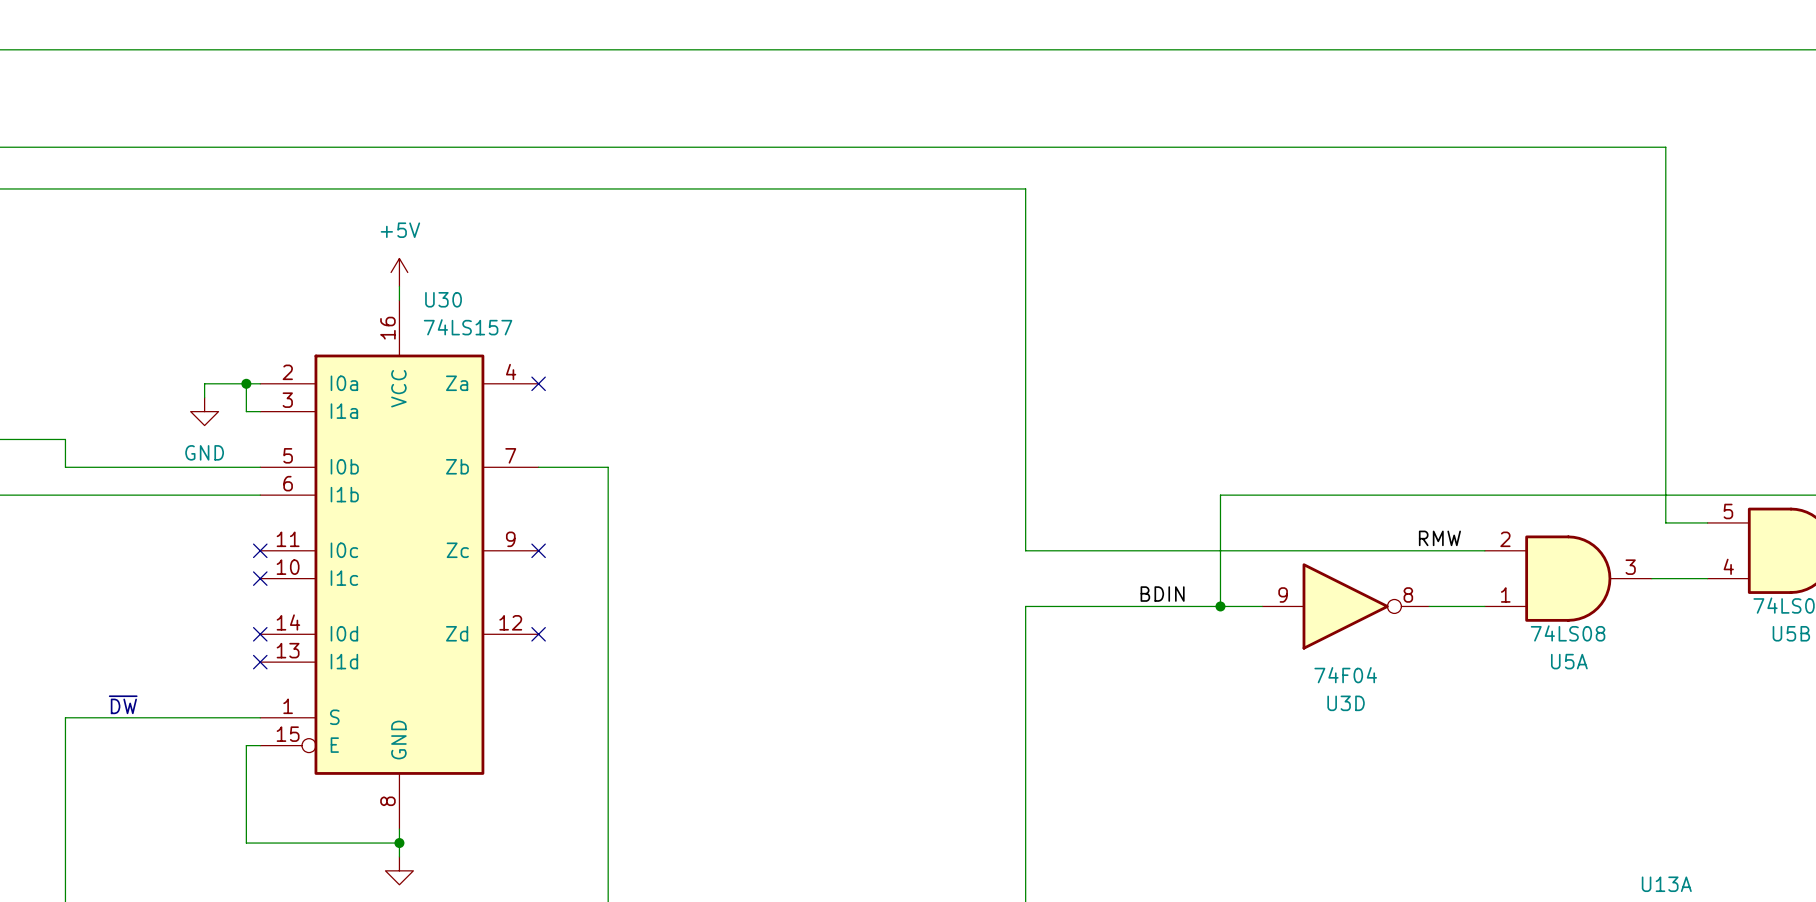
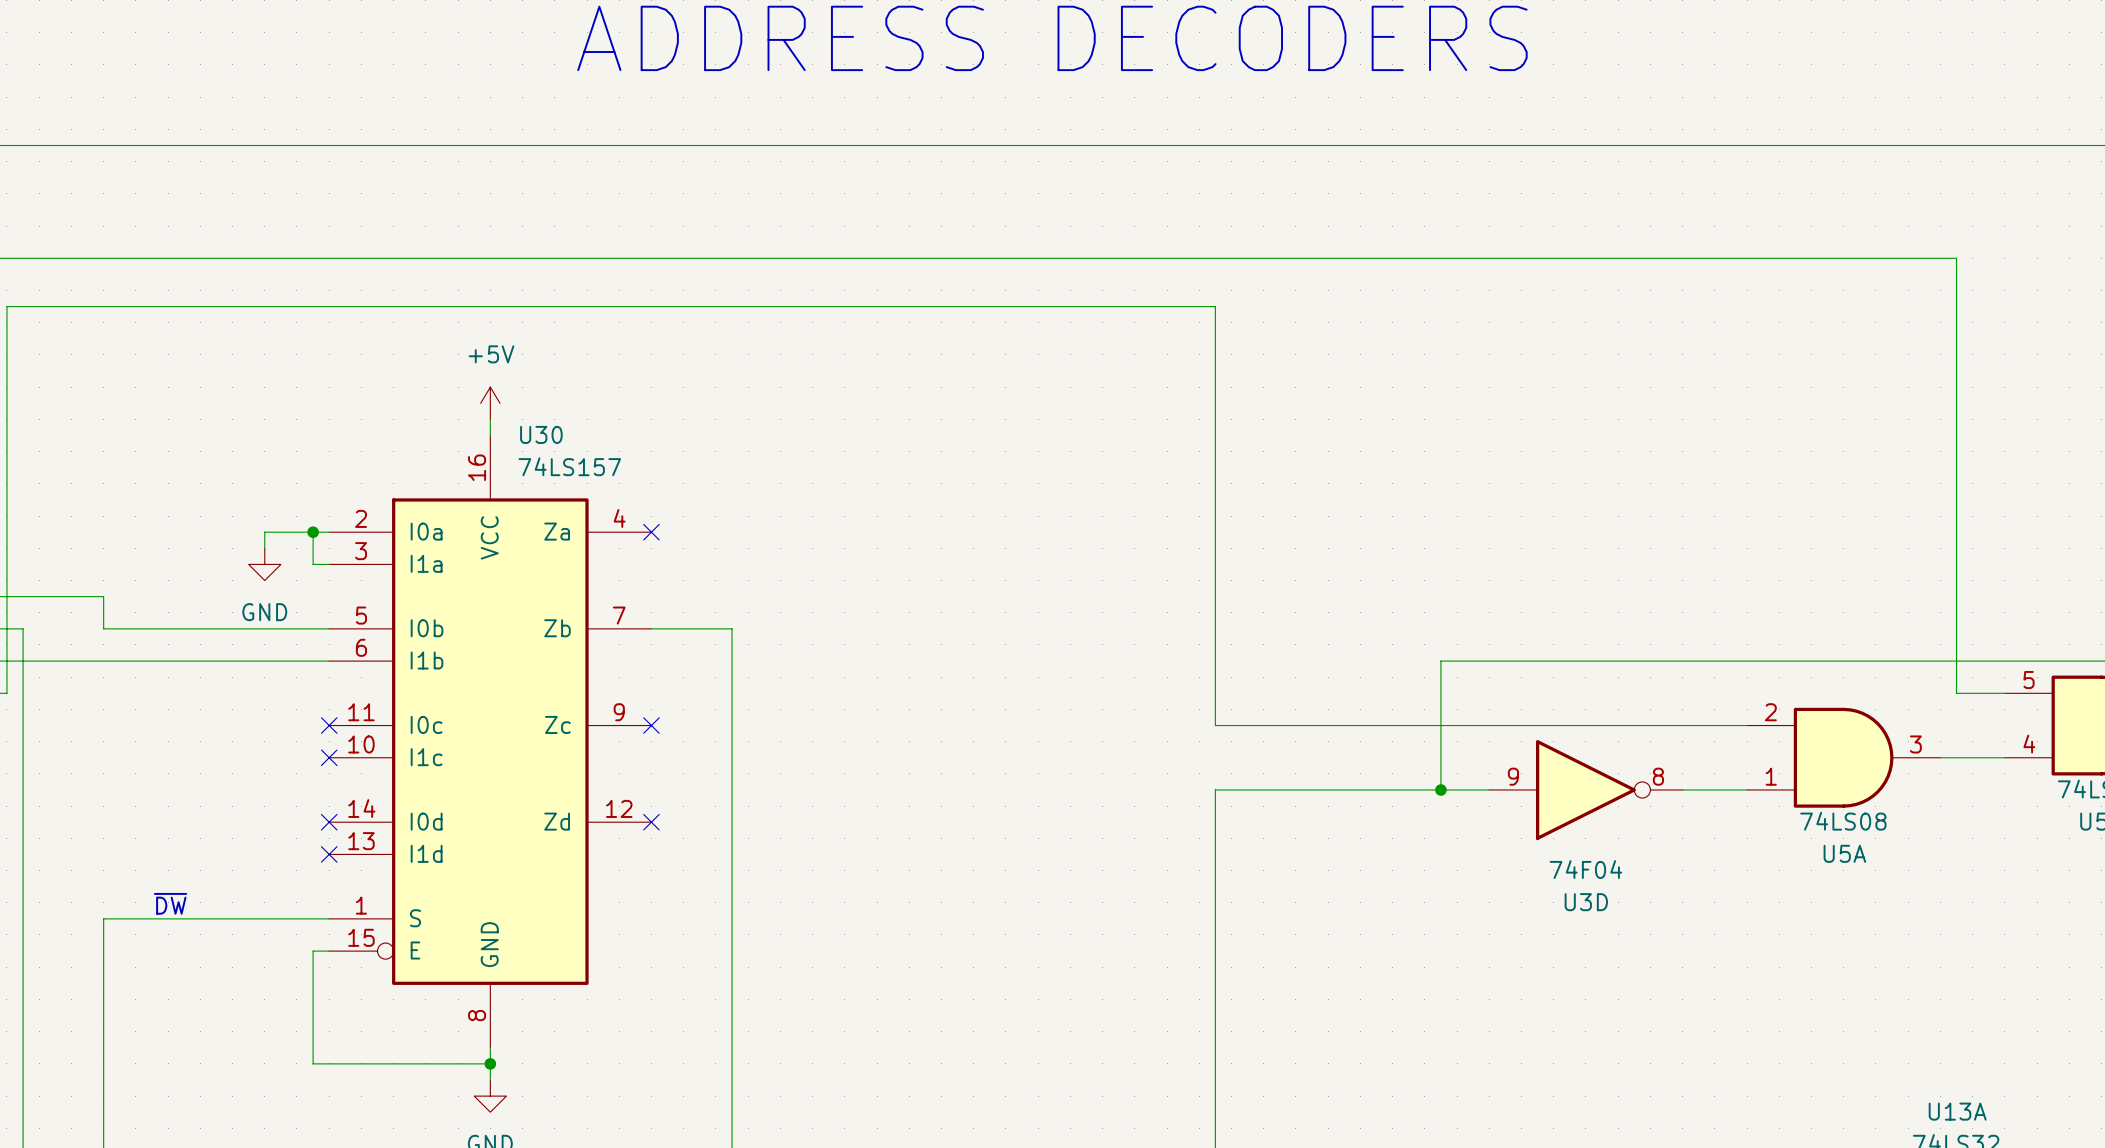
label: RMW (1439, 538) -> none
label: BDIN (1162, 594) -> none

